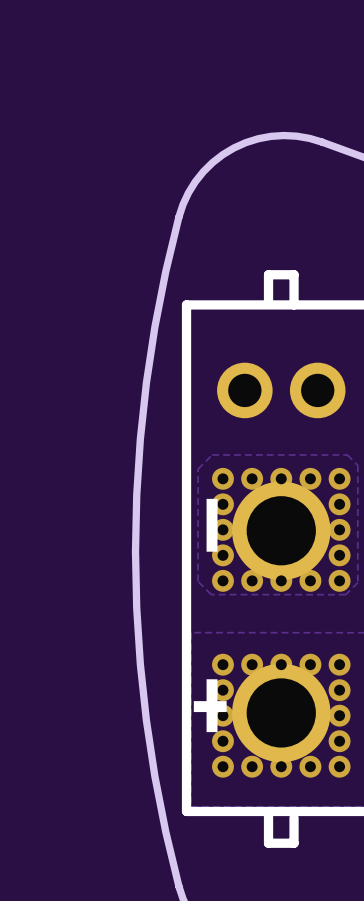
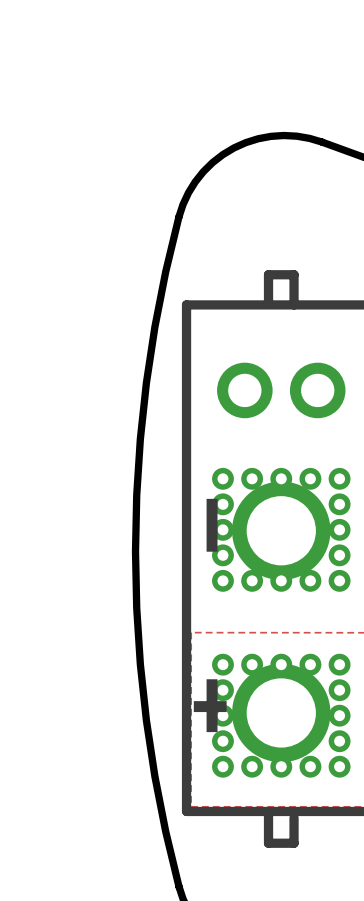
zone outline: (212, 454) (198, 469) (198, 581) (211, 594) (345, 594) (357, 582) (357, 465) (347, 454) (212, 454) -> none

